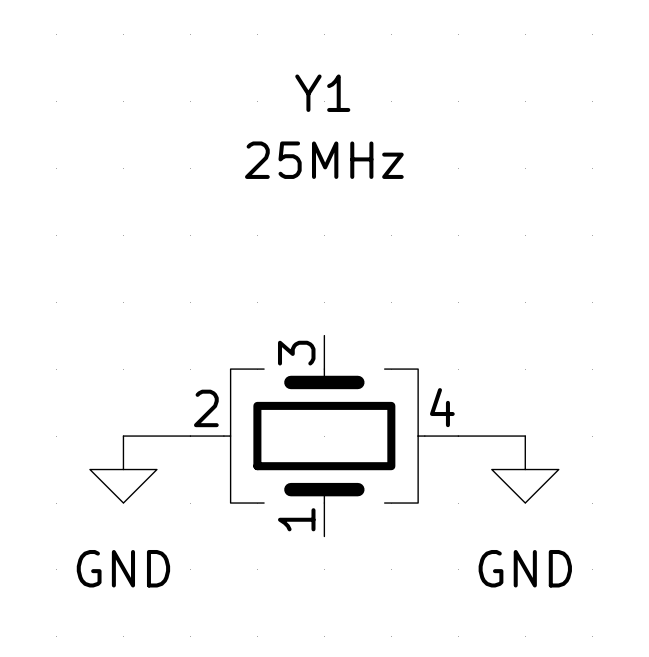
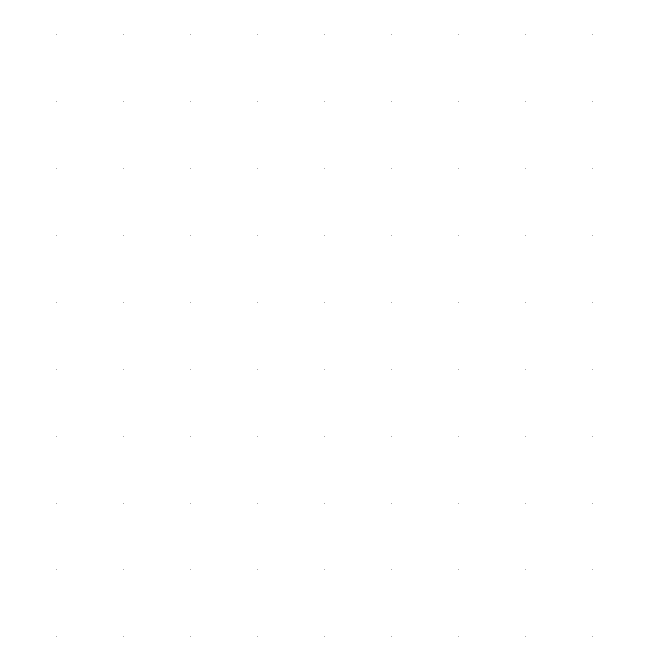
wire: (123, 436) (190, 436) -> none
Y1: 25MHz (324, 436) -> none
wire: (458, 436) (525, 436) -> none
power symbol: GND (123, 469) -> none
power symbol: GND (525, 469) -> none

